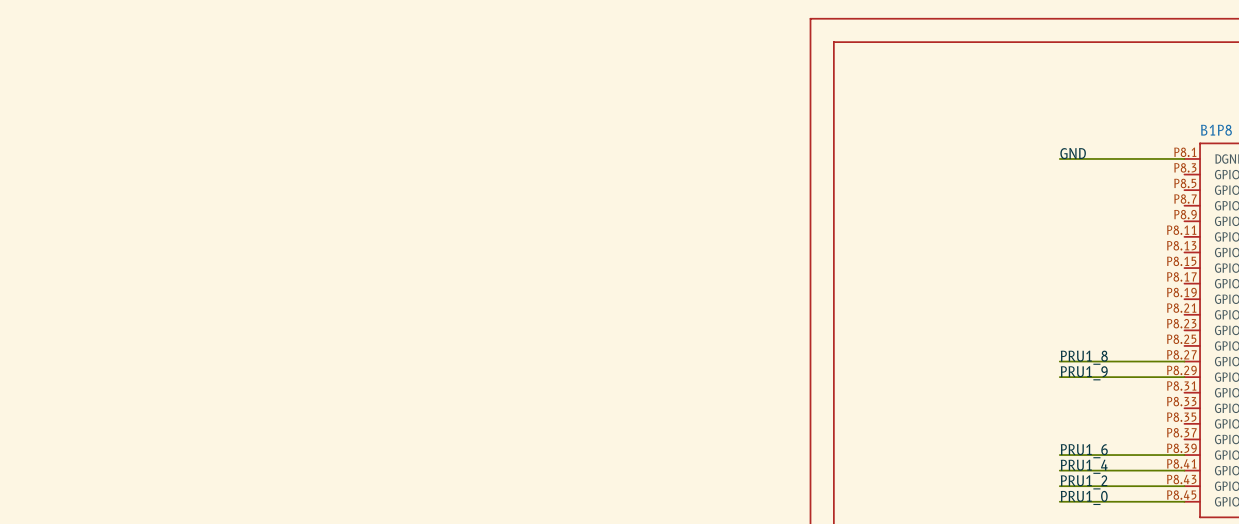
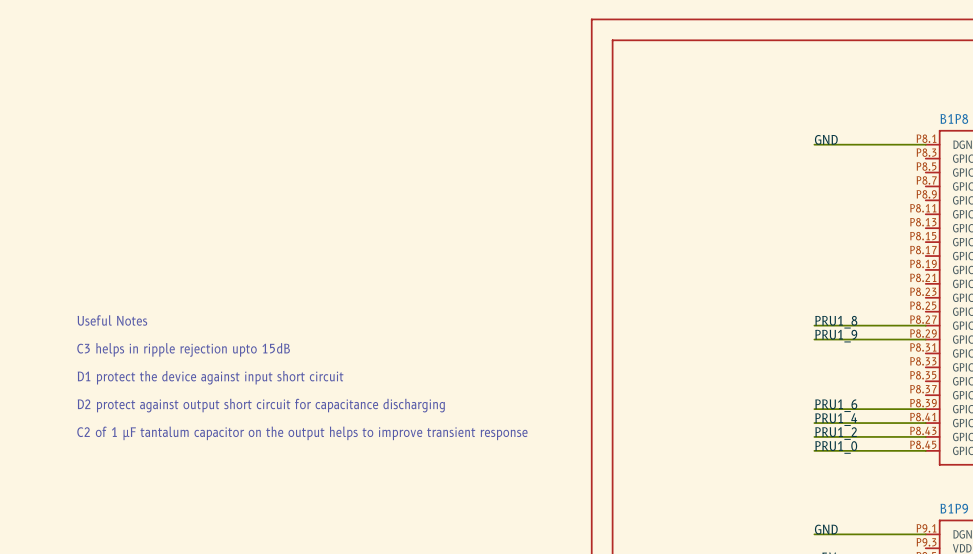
text: none -> Useful Notes (112, 320)
text: none -> C3 helps in ripple rejection upto 15dB (183, 349)
text: none -> D1 protect the device against input short circuit (210, 377)
text: none -> D2 protect against output short circuit for capacitance discharging (261, 405)
text: none -> C2 of 1 µF tantalum capacitor on the output helps to improve transient response (302, 433)

